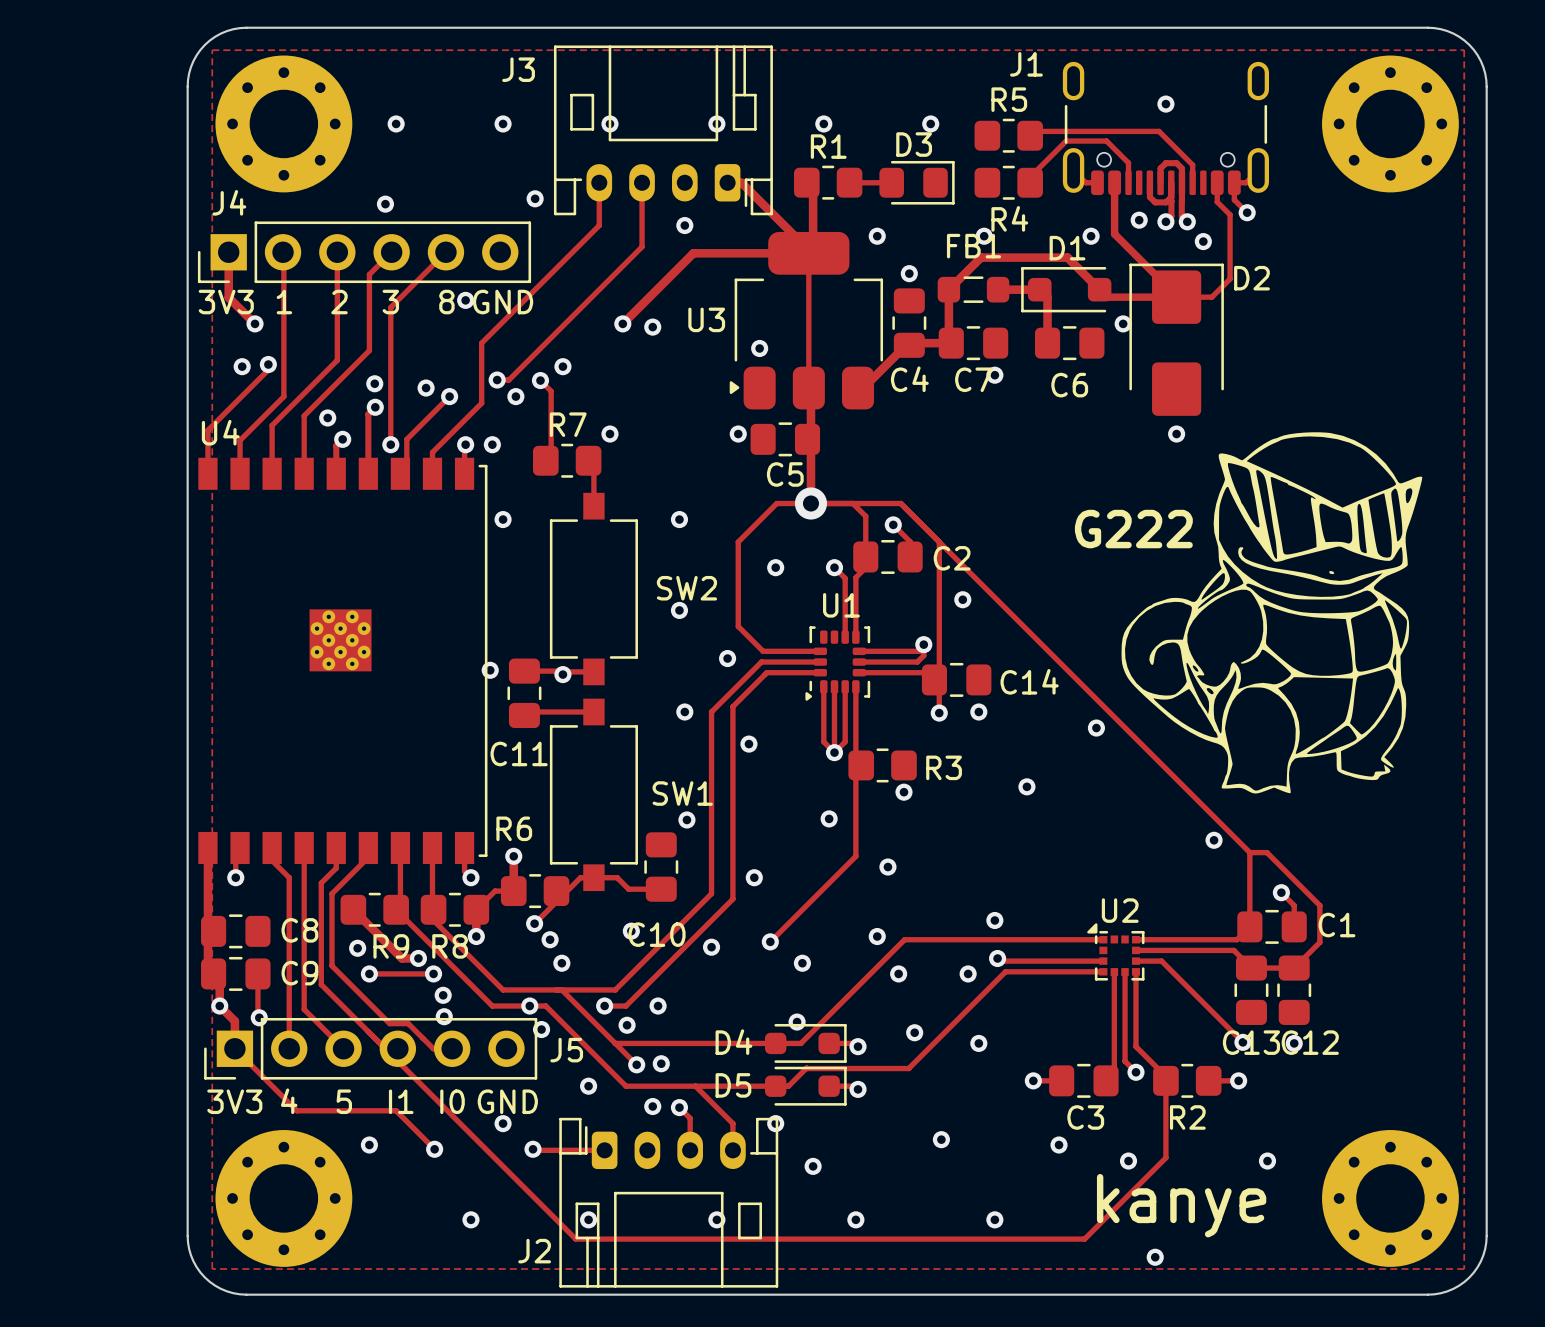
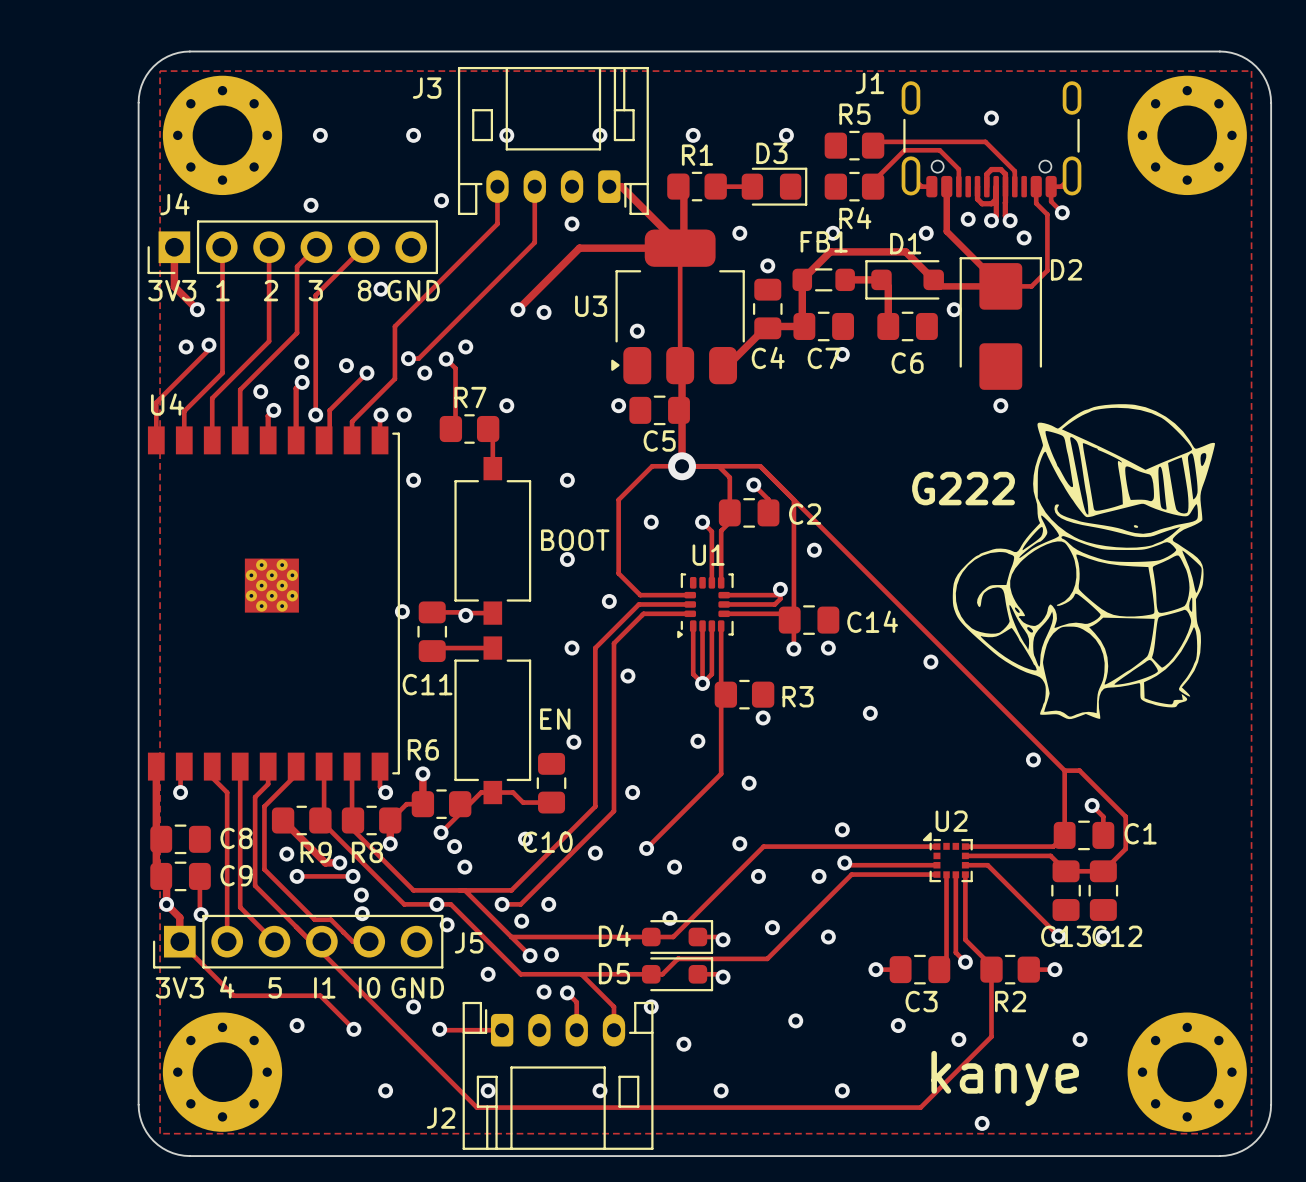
SW2 name: SW2 (686, 588) -> BOOT (575, 540)
SW1 name: SW1 (682, 793) -> EN (555, 719)

